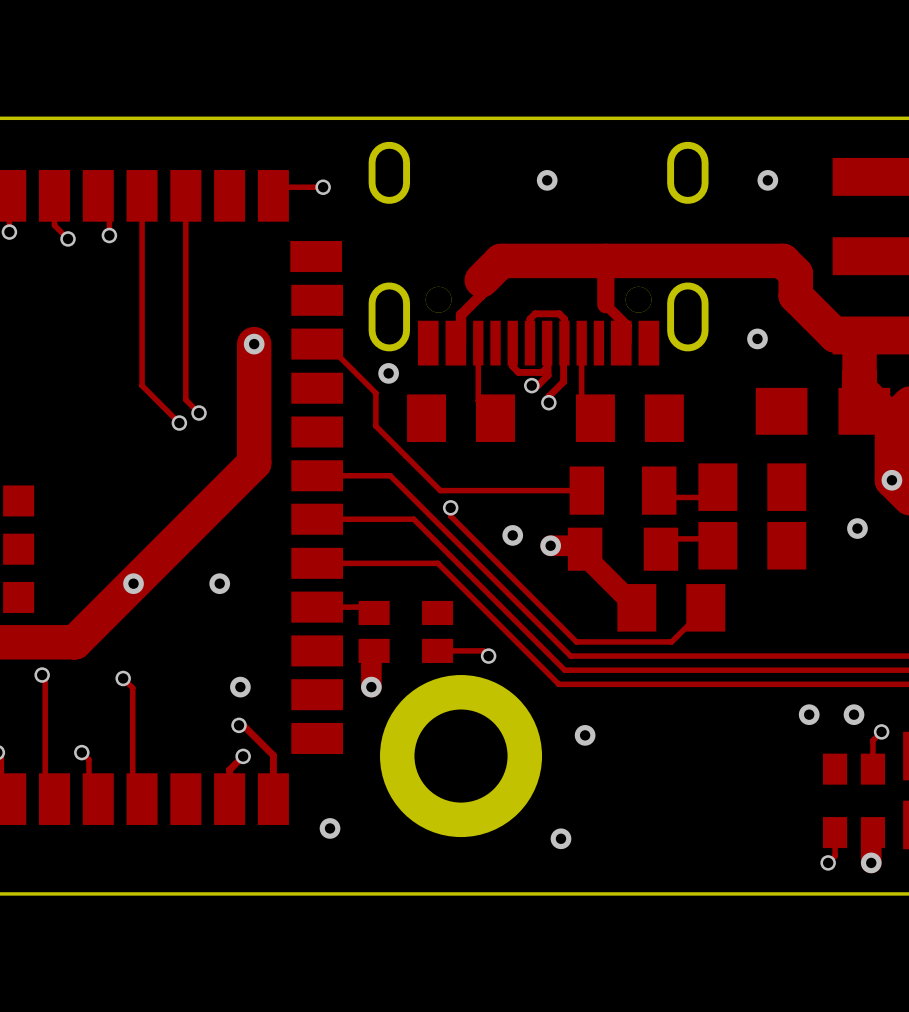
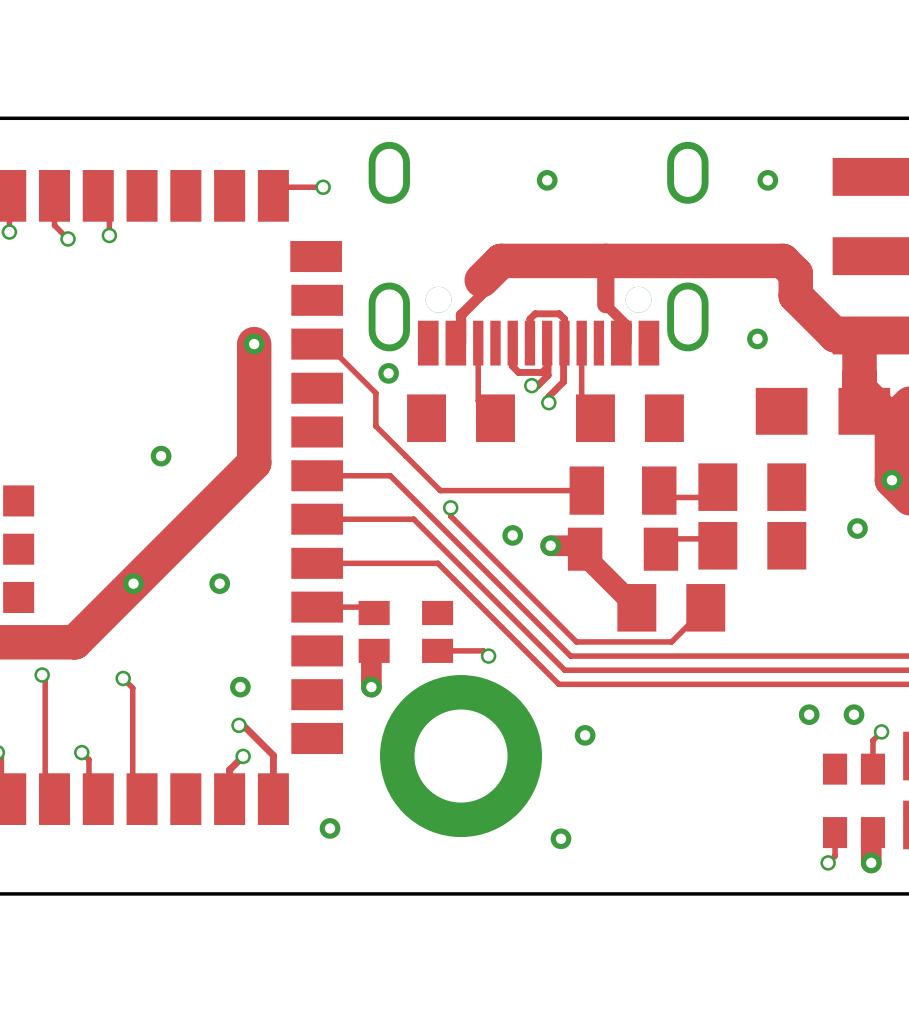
track: (142, 195) (142, 385) (179, 423) -> none
track: (185, 195) (185, 399) (199, 413) -> none
via: (199, 413) -> none
via: (179, 423) -> none
via: none -> (161, 456)

